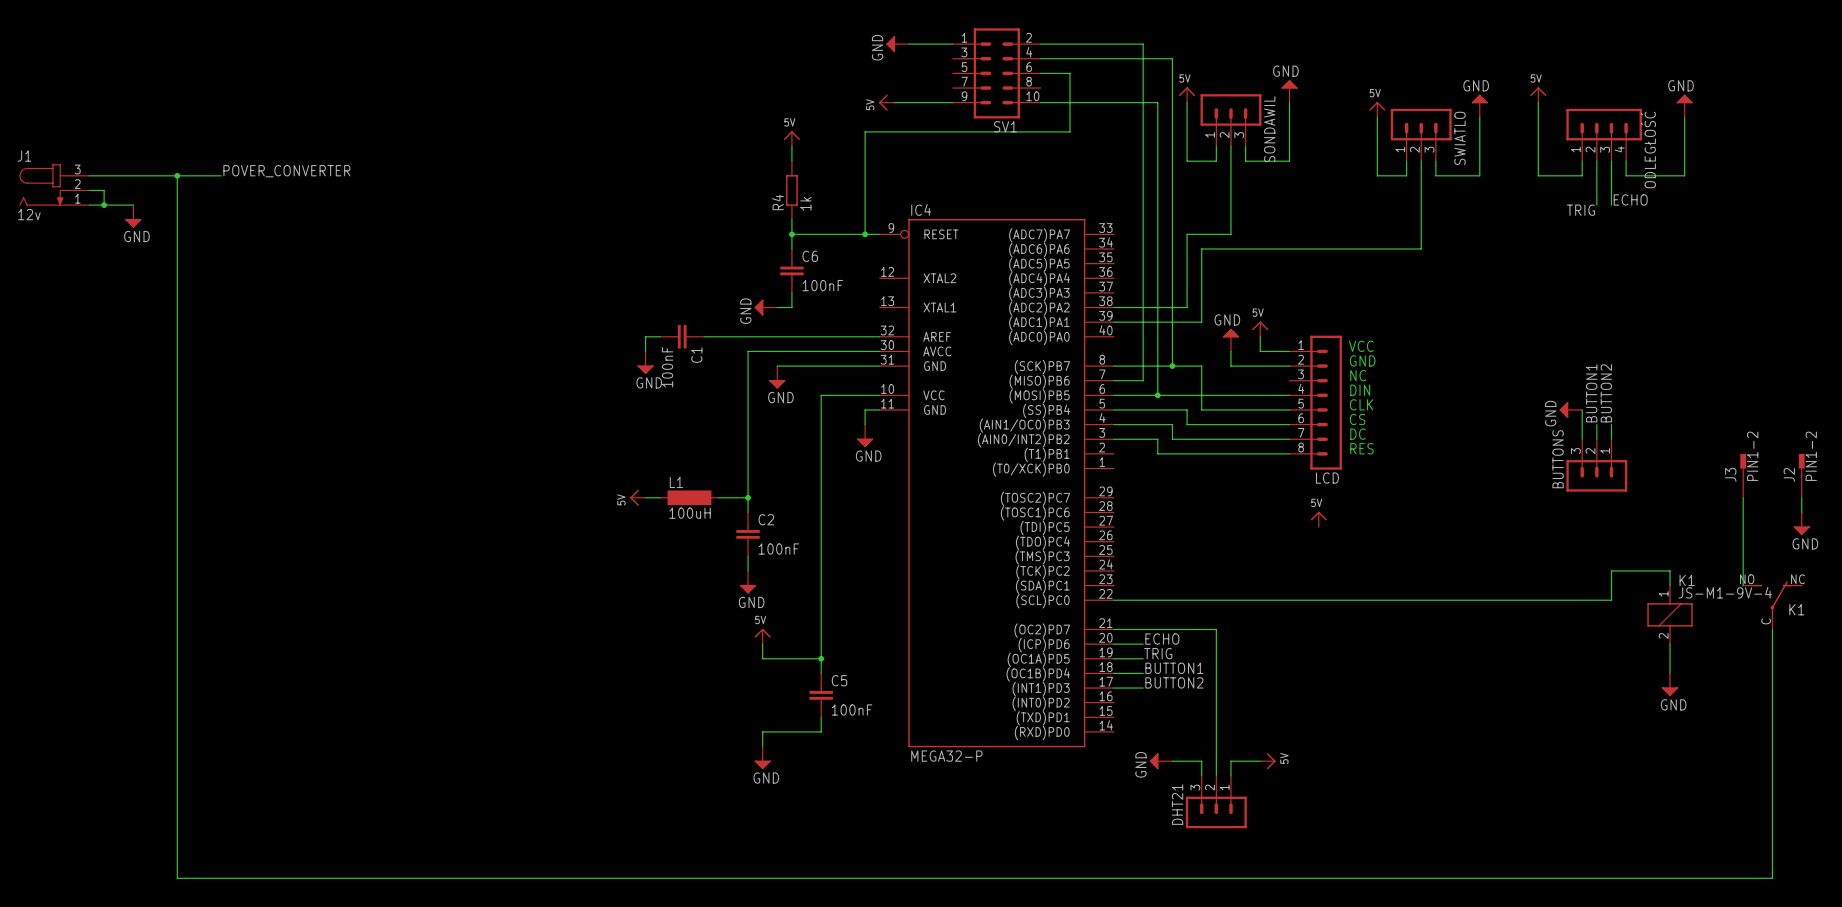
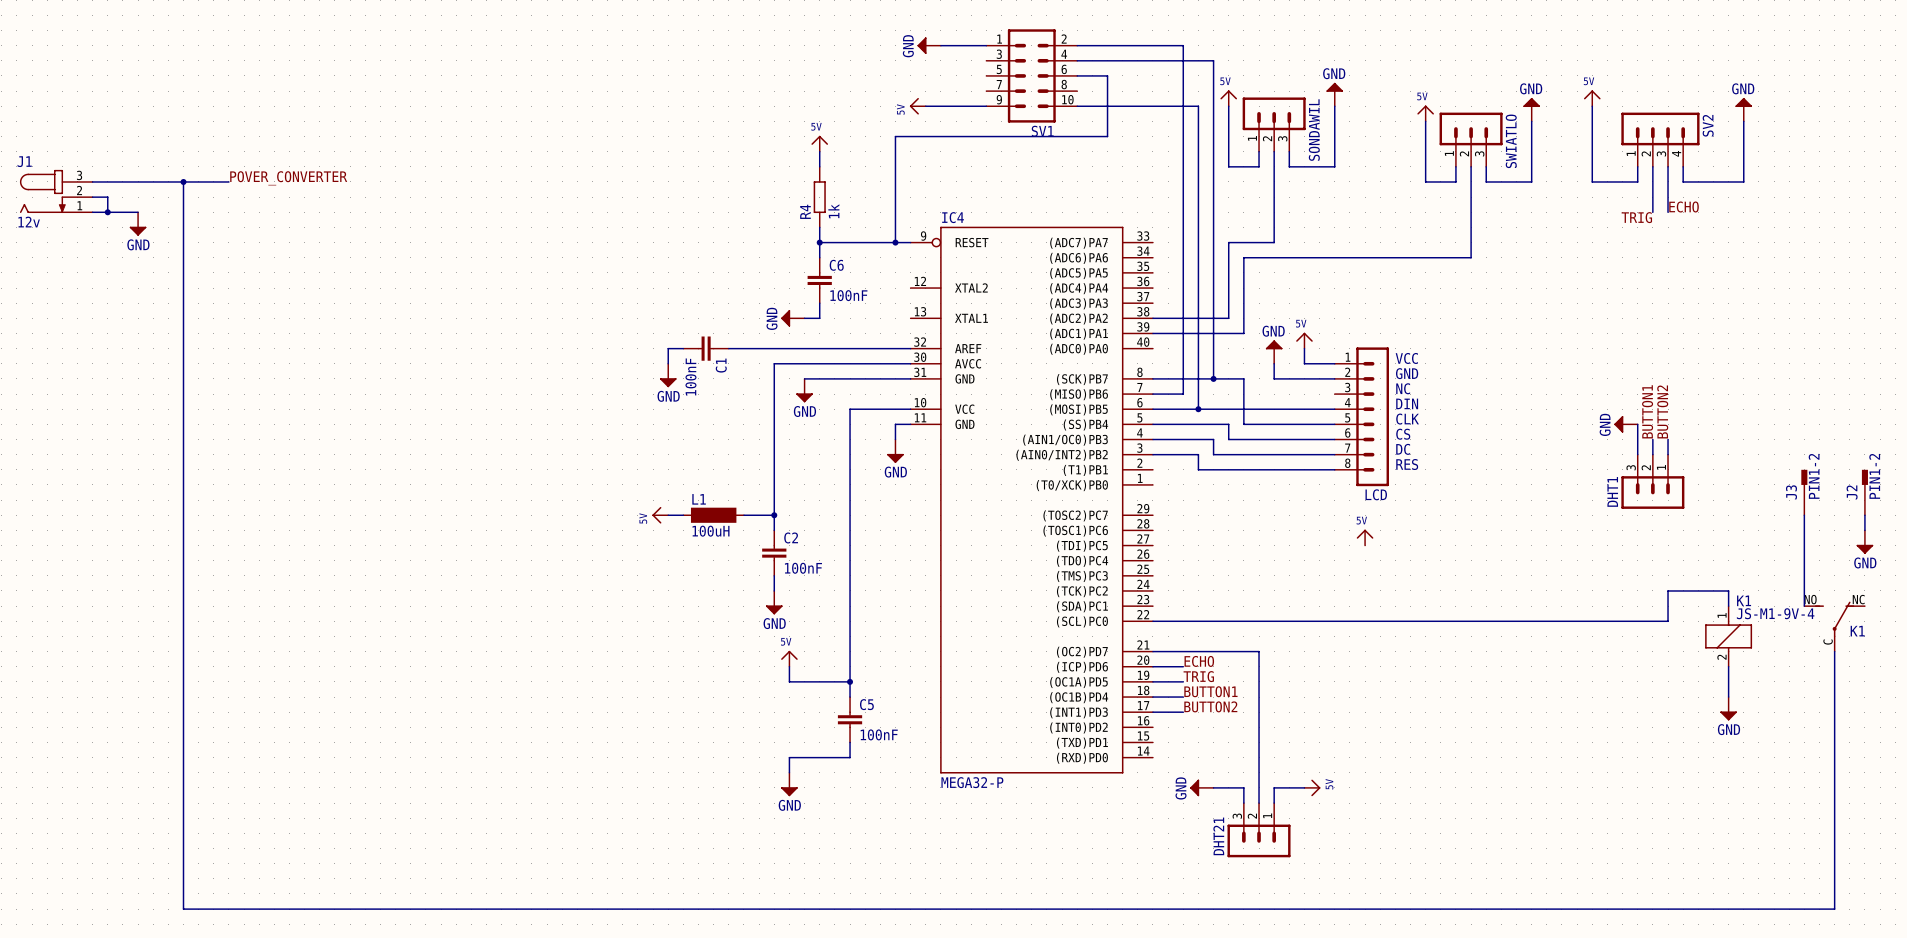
ODLEGŁOŚĆ name: ODLEGŁOŚĆ (1648, 150) -> SV2 (1708, 125)
BUTTONS name: BUTTONS (1558, 459) -> DHT1 (1612, 491)

